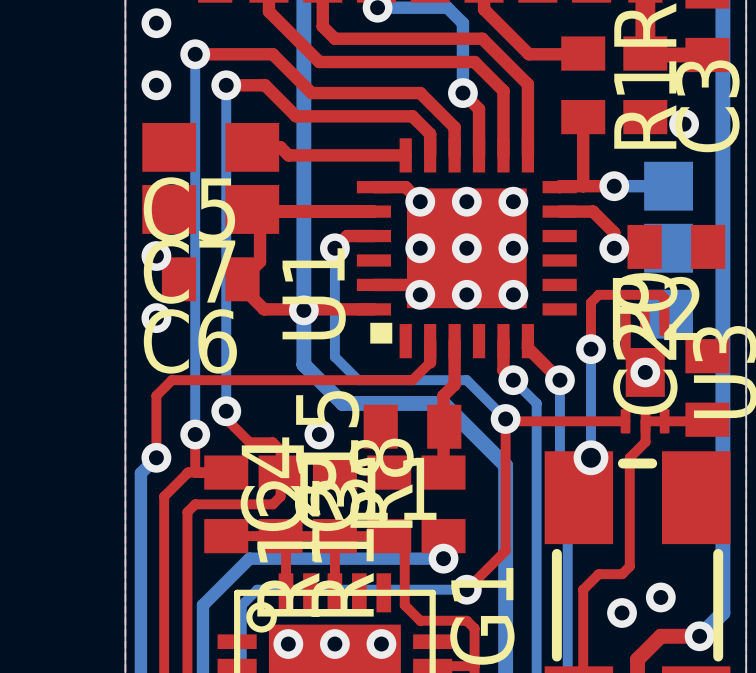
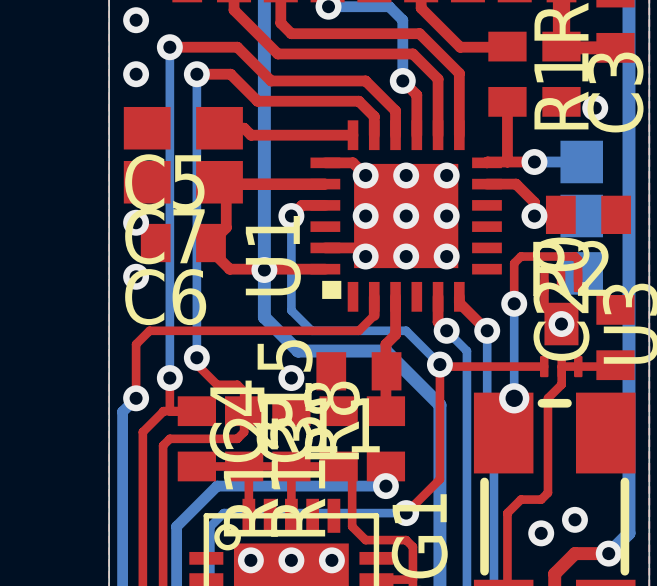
via position: (319, 434) -> (291, 378)

